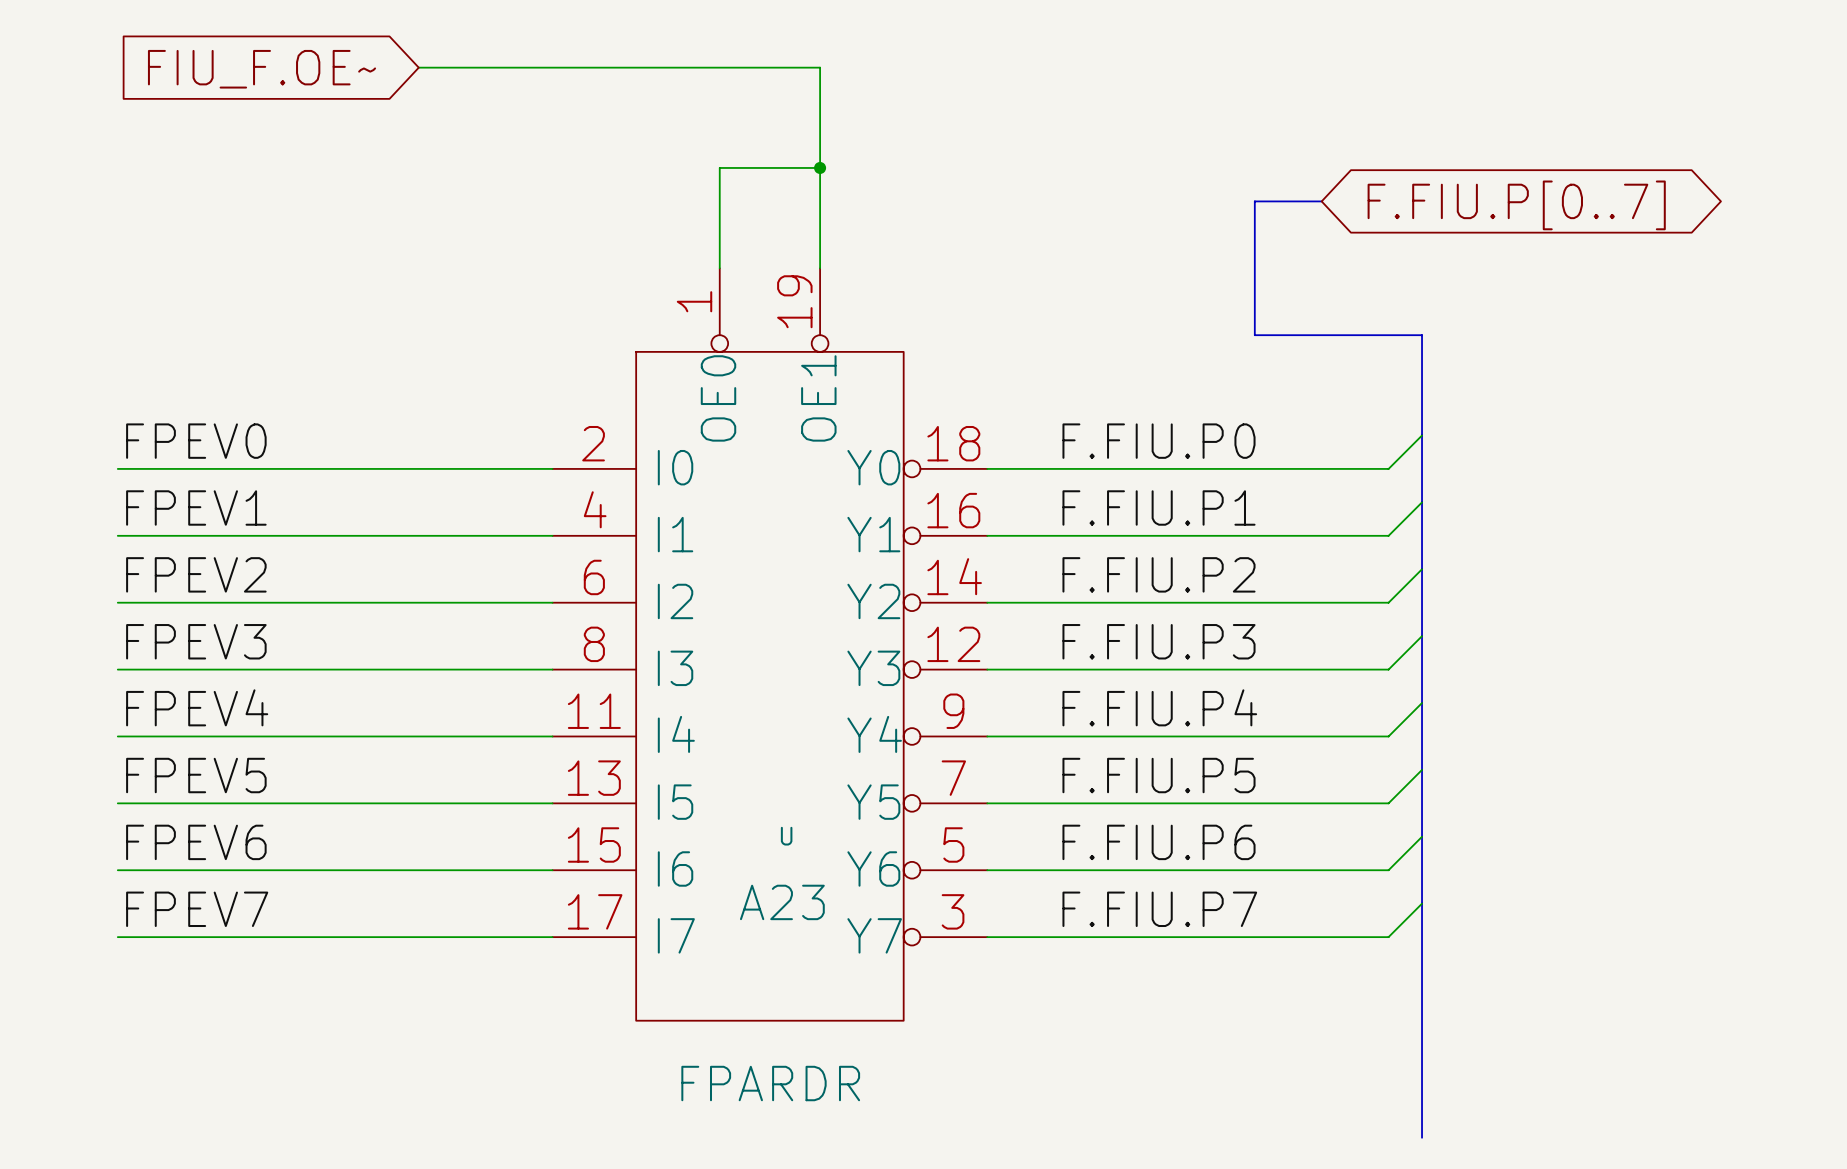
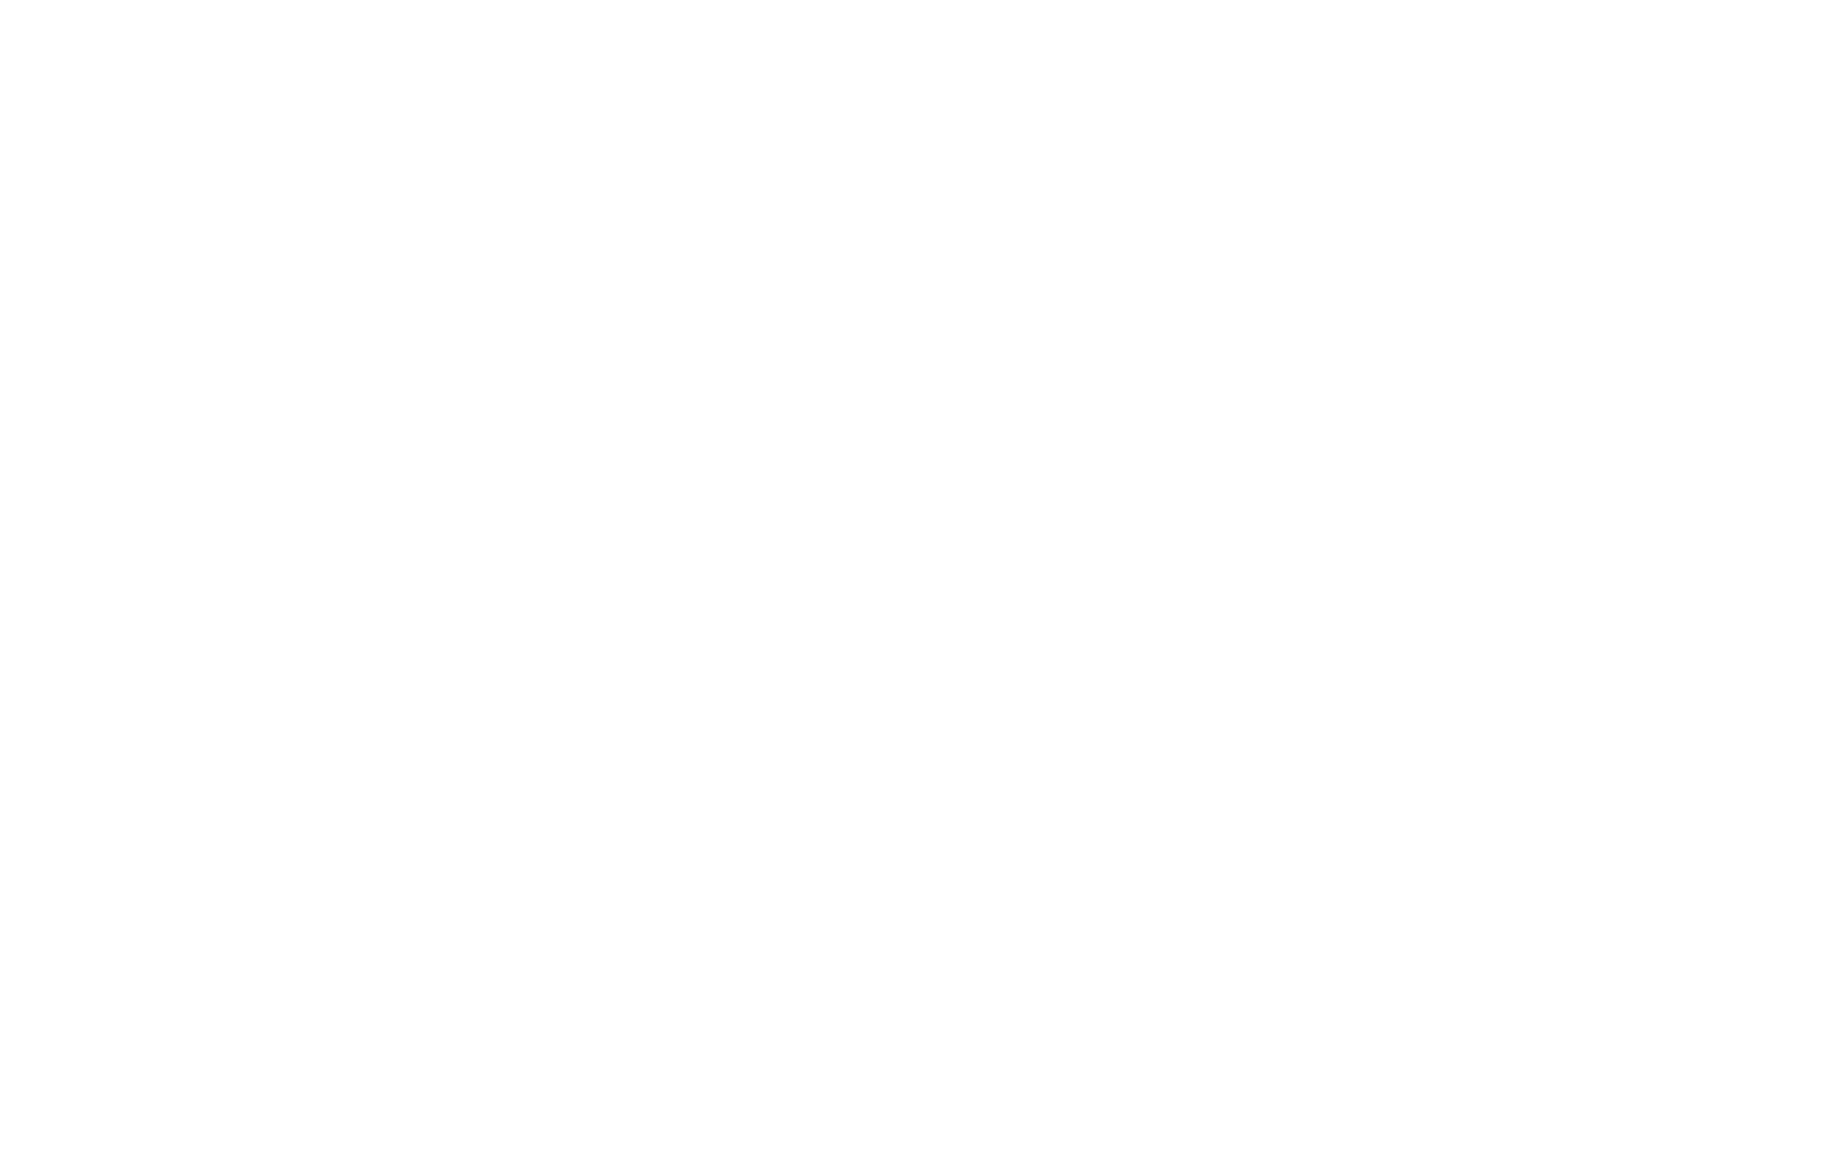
wire: (418, 67) (820, 67) (820, 268) -> none
global label: FIU_F.OE~ (262, 69) -> none
wire: (820, 167) (719, 167) (719, 268) -> none
junction: (820, 167) -> none
bus: (1321, 201) (1254, 201) (1254, 335) (1422, 335) (1422, 1137) -> none
global label: F.FIU.P[0..7] (1516, 205) -> none
wire: (1422, 435) (1388, 468) (987, 468) -> none
label: FPEV0 (196, 441) -> none
label: F.FIU.P0 (1158, 441) -> none
wire: (117, 468) (552, 468) -> none
wire: (1422, 502) (1388, 535) (987, 535) -> none
label: FPEV1 (196, 507) -> none
label: F.FIU.P1 (1158, 507) -> none
wire: (117, 535) (552, 535) -> none
wire: (1422, 569) (1388, 602) (987, 602) -> none
label: FPEV2 (196, 574) -> none
label: F.FIU.P2 (1158, 574) -> none
wire: (117, 602) (552, 602) -> none
wire: (1422, 636) (1388, 669) (987, 669) -> none
label: FPEV3 (196, 641) -> none
label: F.FIU.P3 (1158, 641) -> none
U: (769, 644) -> none
wire: (117, 669) (552, 669) -> none
wire: (1422, 703) (1388, 736) (987, 736) -> none
label: FPEV4 (197, 707) -> none
label: F.FIU.P4 (1159, 707) -> none
wire: (117, 736) (552, 736) -> none
wire: (1422, 769) (1388, 803) (987, 803) -> none
label: FPEV5 (196, 775) -> none
label: F.FIU.P5 (1158, 775) -> none
wire: (117, 803) (552, 803) -> none
wire: (1422, 836) (1388, 870) (987, 870) -> none
label: FPEV6 (196, 842) -> none
label: F.FIU.P6 (1158, 842) -> none
wire: (117, 870) (552, 870) -> none
wire: (1422, 903) (1388, 937) (987, 937) -> none
label: FPEV7 (197, 909) -> none
label: F.FIU.P7 (1159, 909) -> none
wire: (117, 937) (552, 937) -> none

